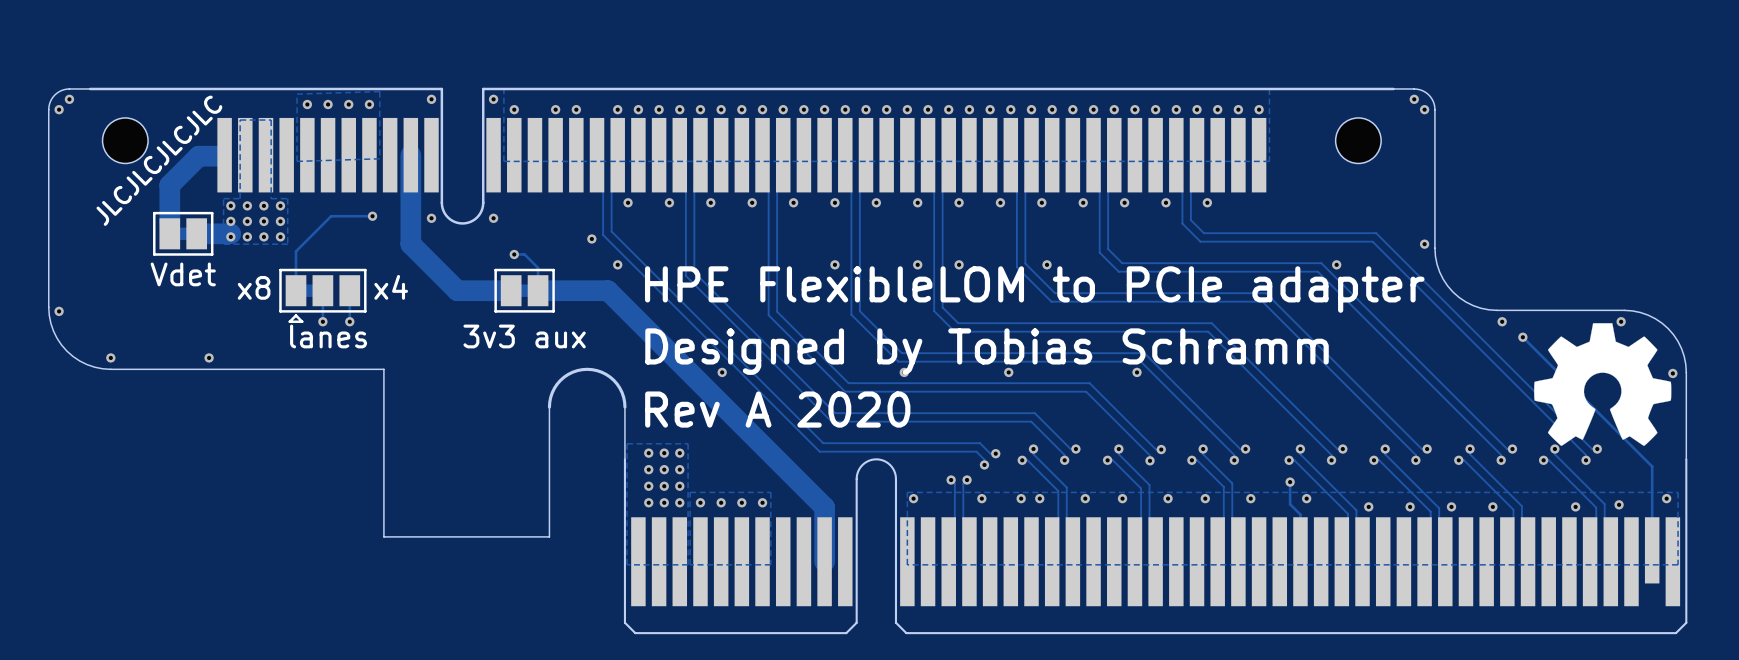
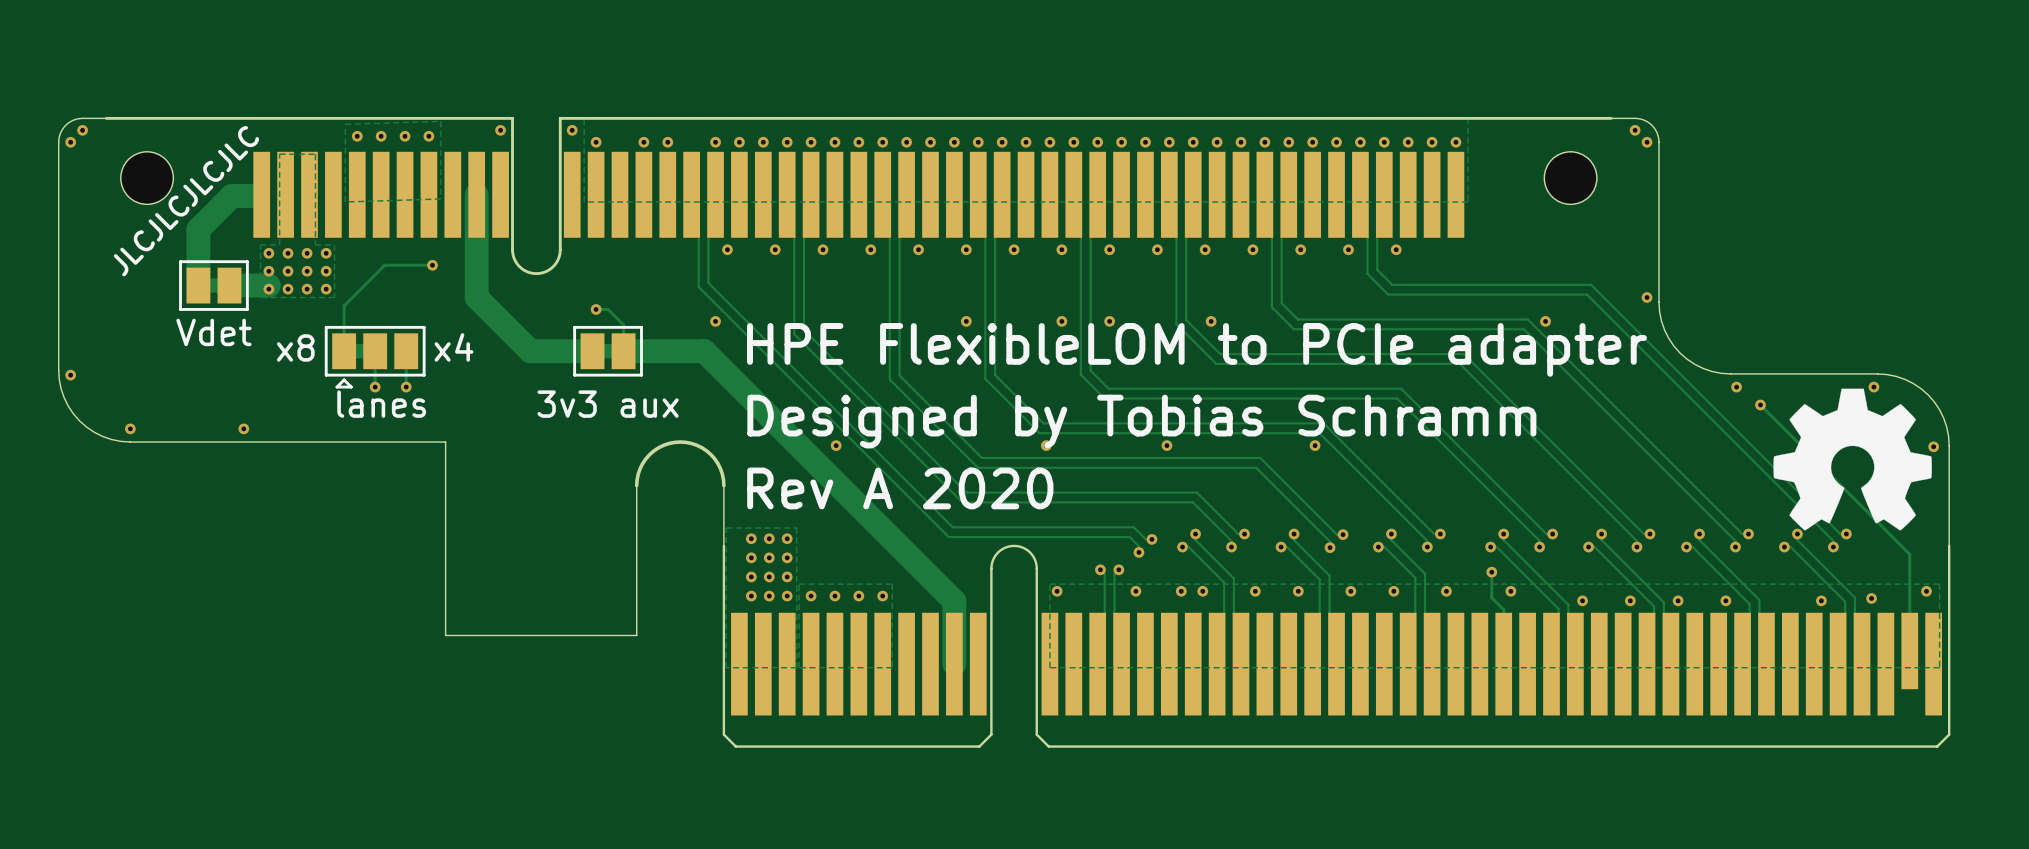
via: (431, 218) -> none
via: (493, 218) -> none
via: (591, 238) -> none

